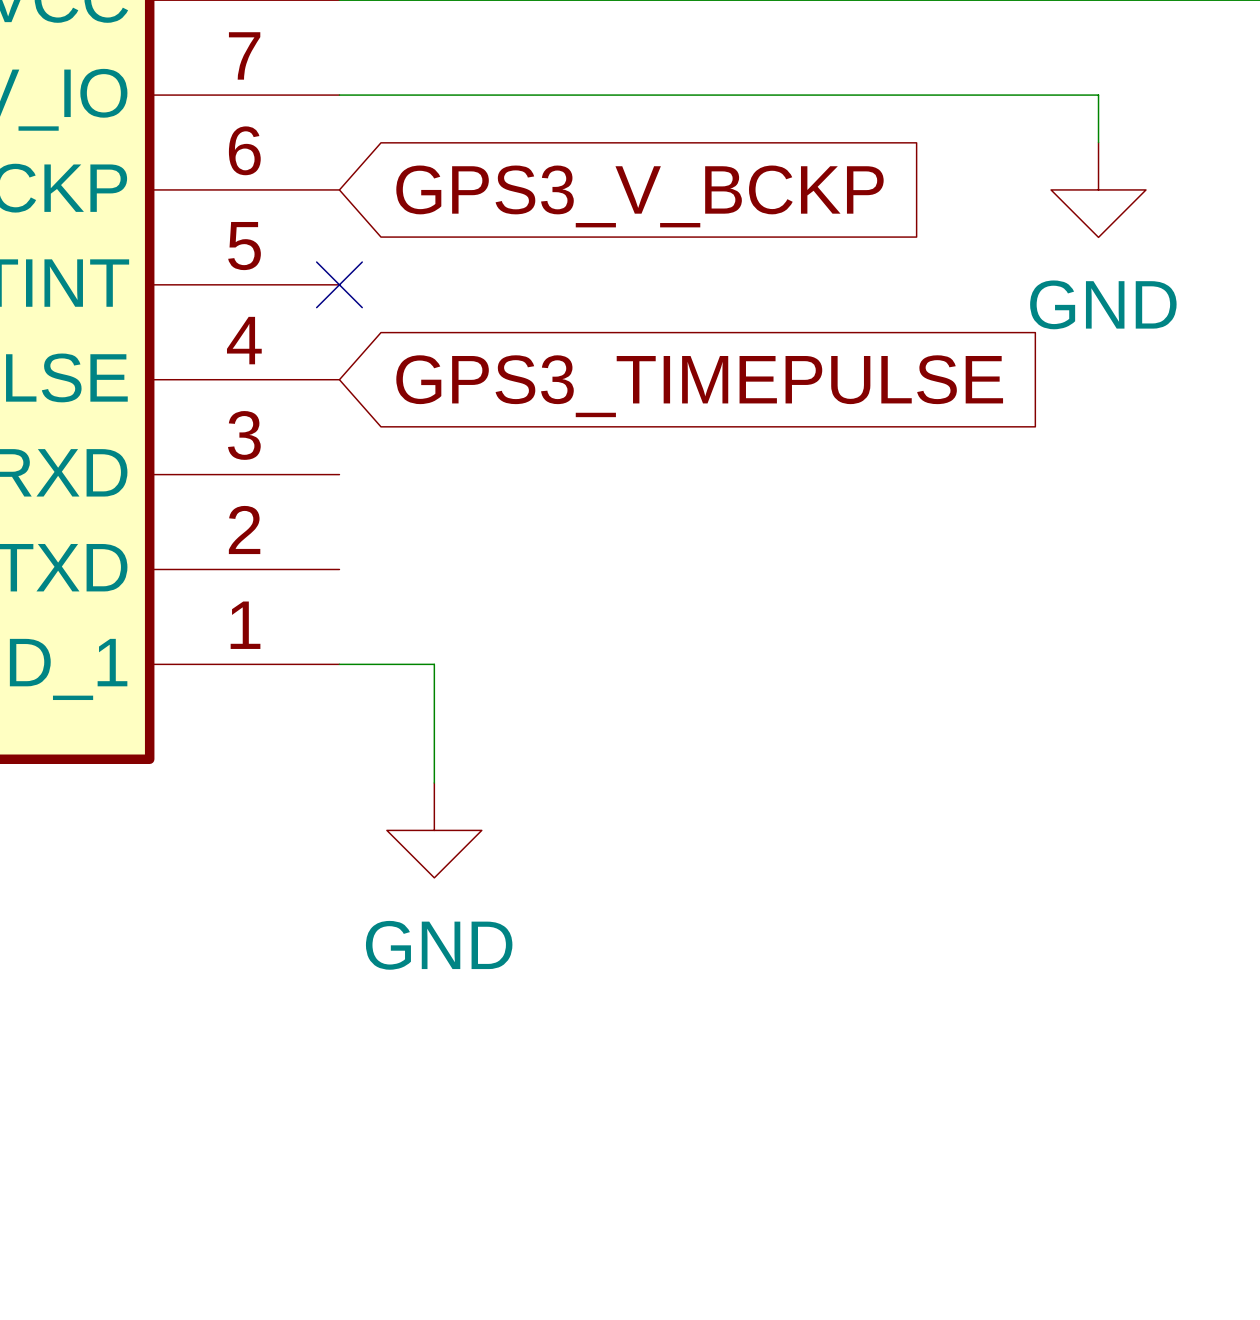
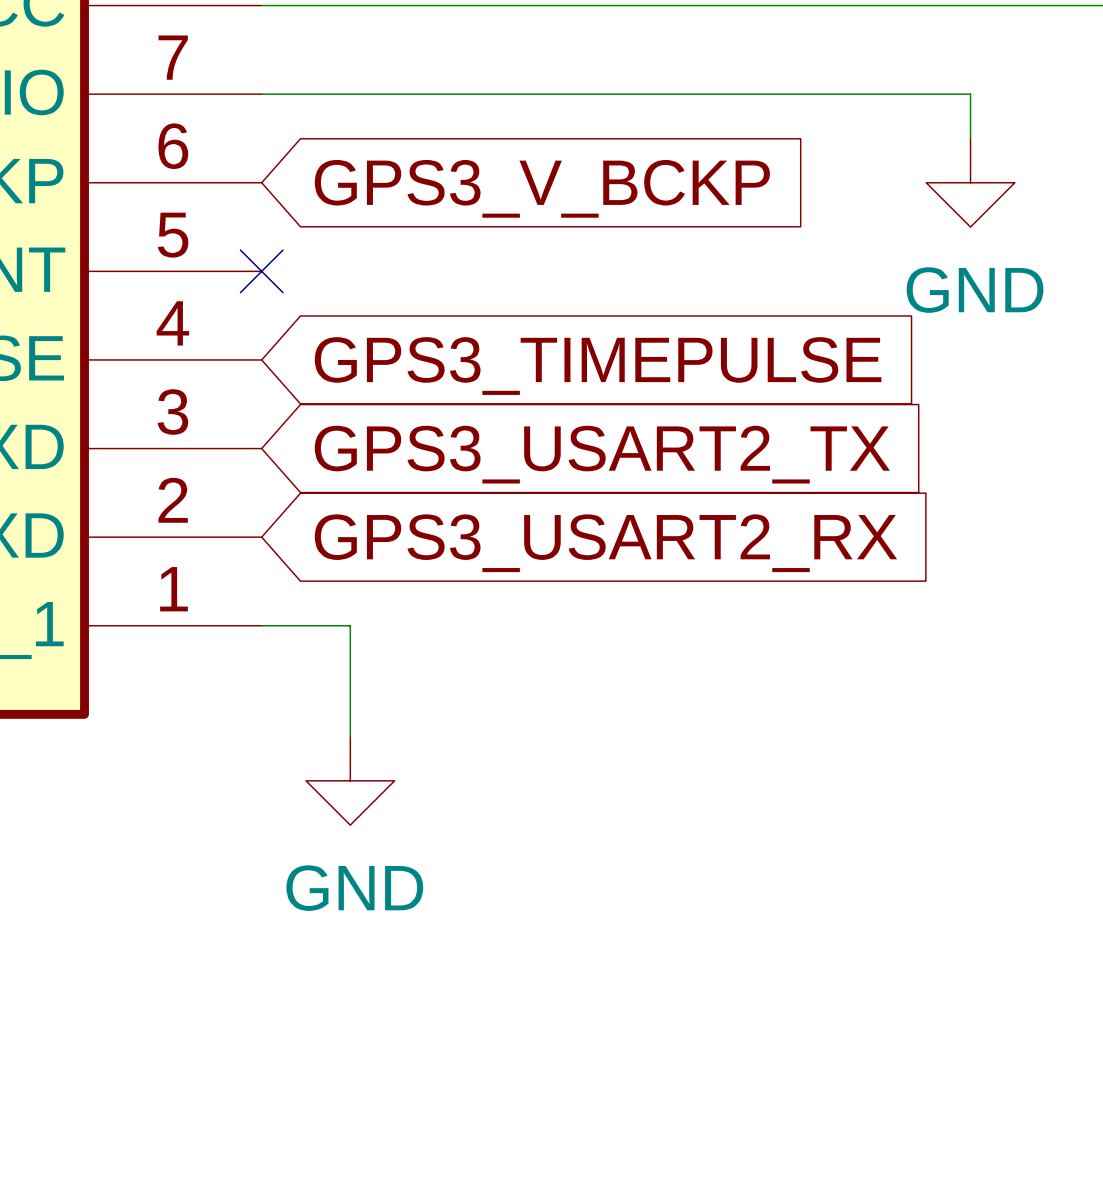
global label: none -> GPS3_USART2_TX (602, 454)
global label: none -> GPS3_USART2_RX (605, 543)

